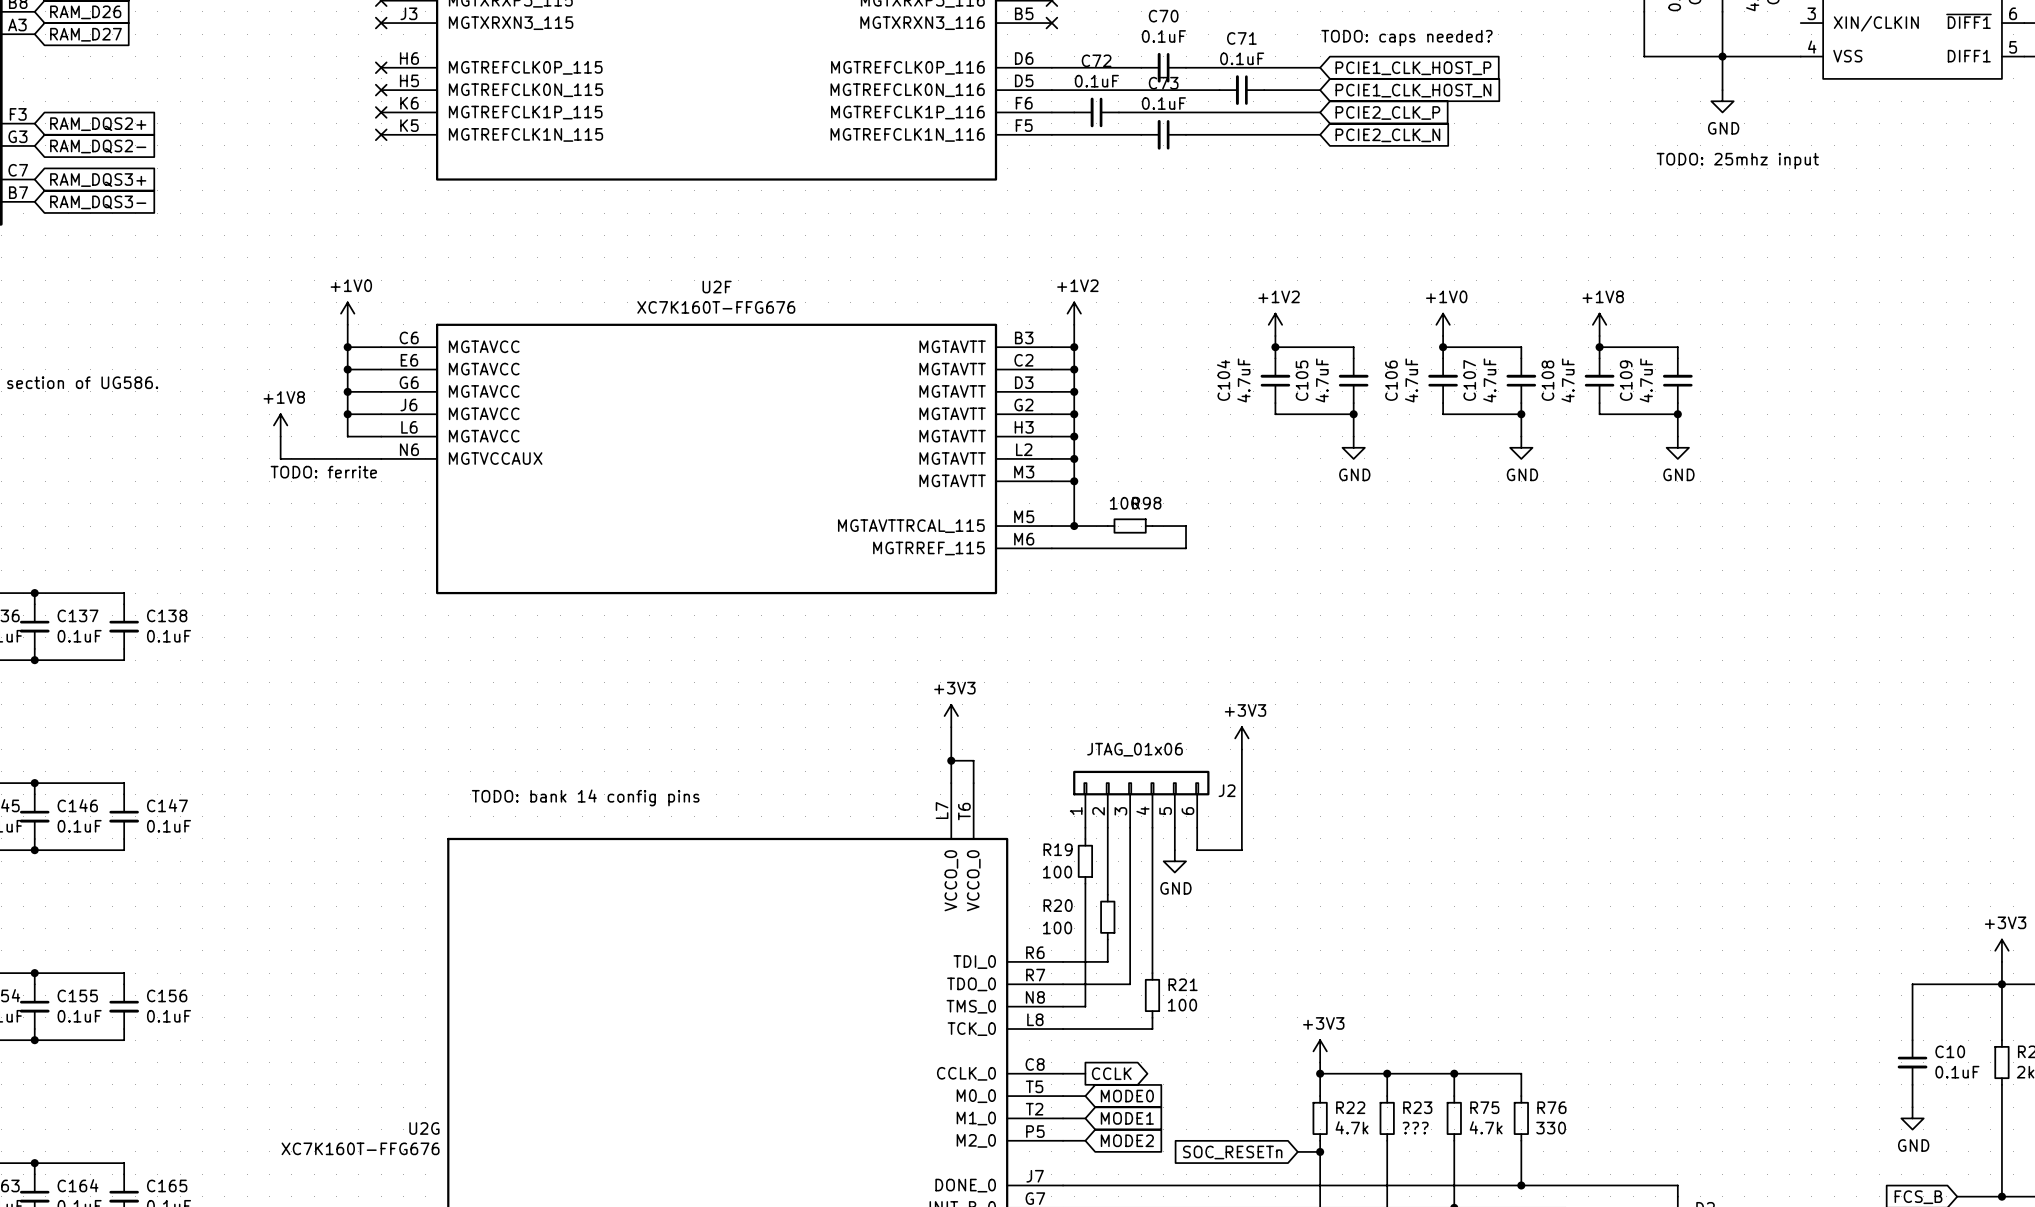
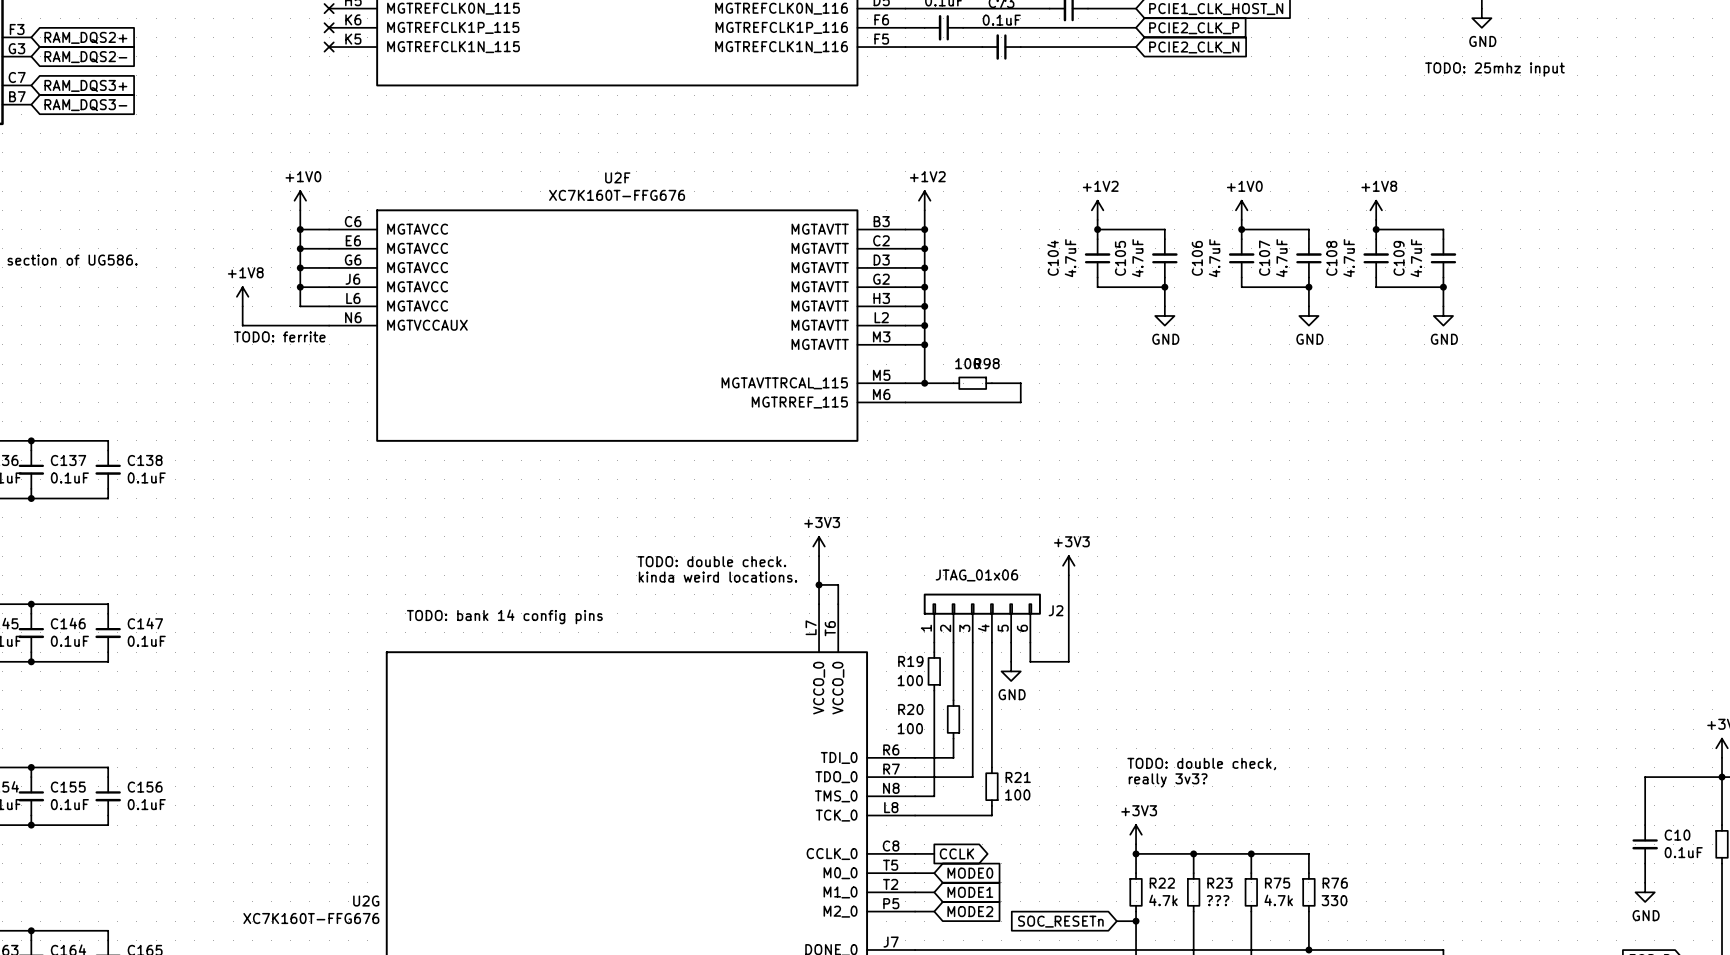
text: none -> TODO: double check. (711, 561)
text: none -> kinda weird locations. (718, 577)
text: none -> TODO: double check, (1201, 764)
text: none -> really 3v3? (1168, 780)

